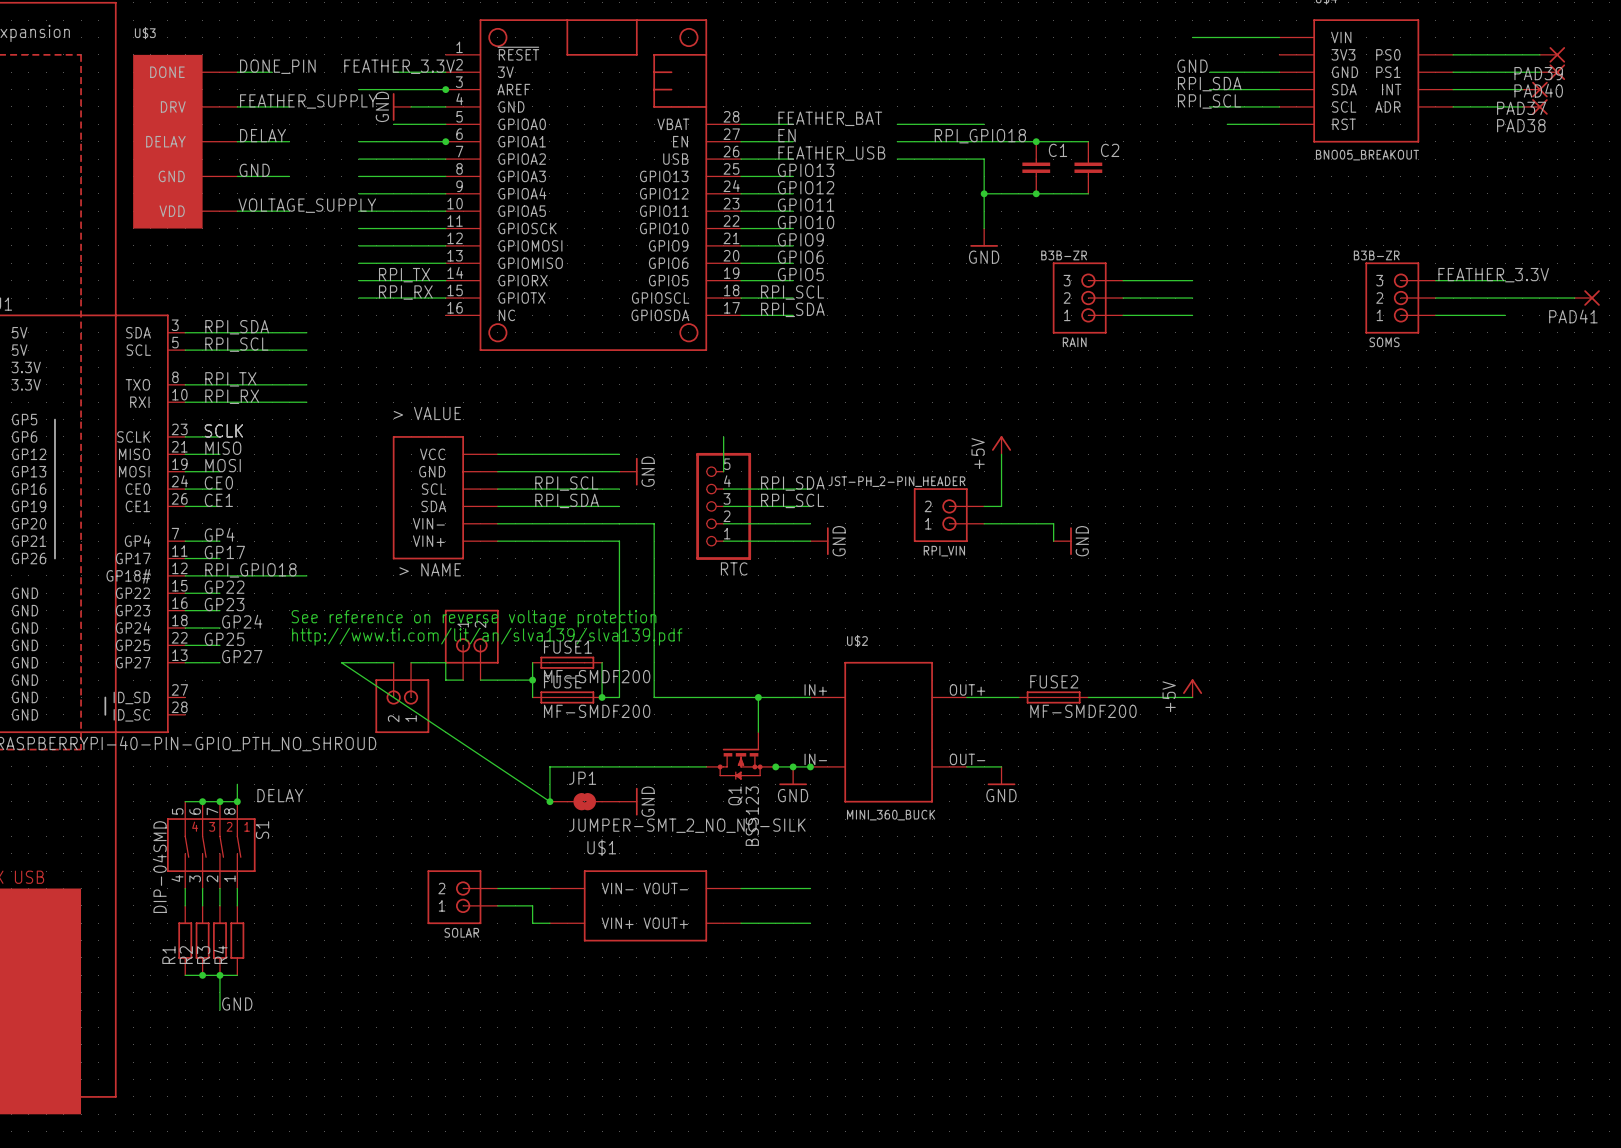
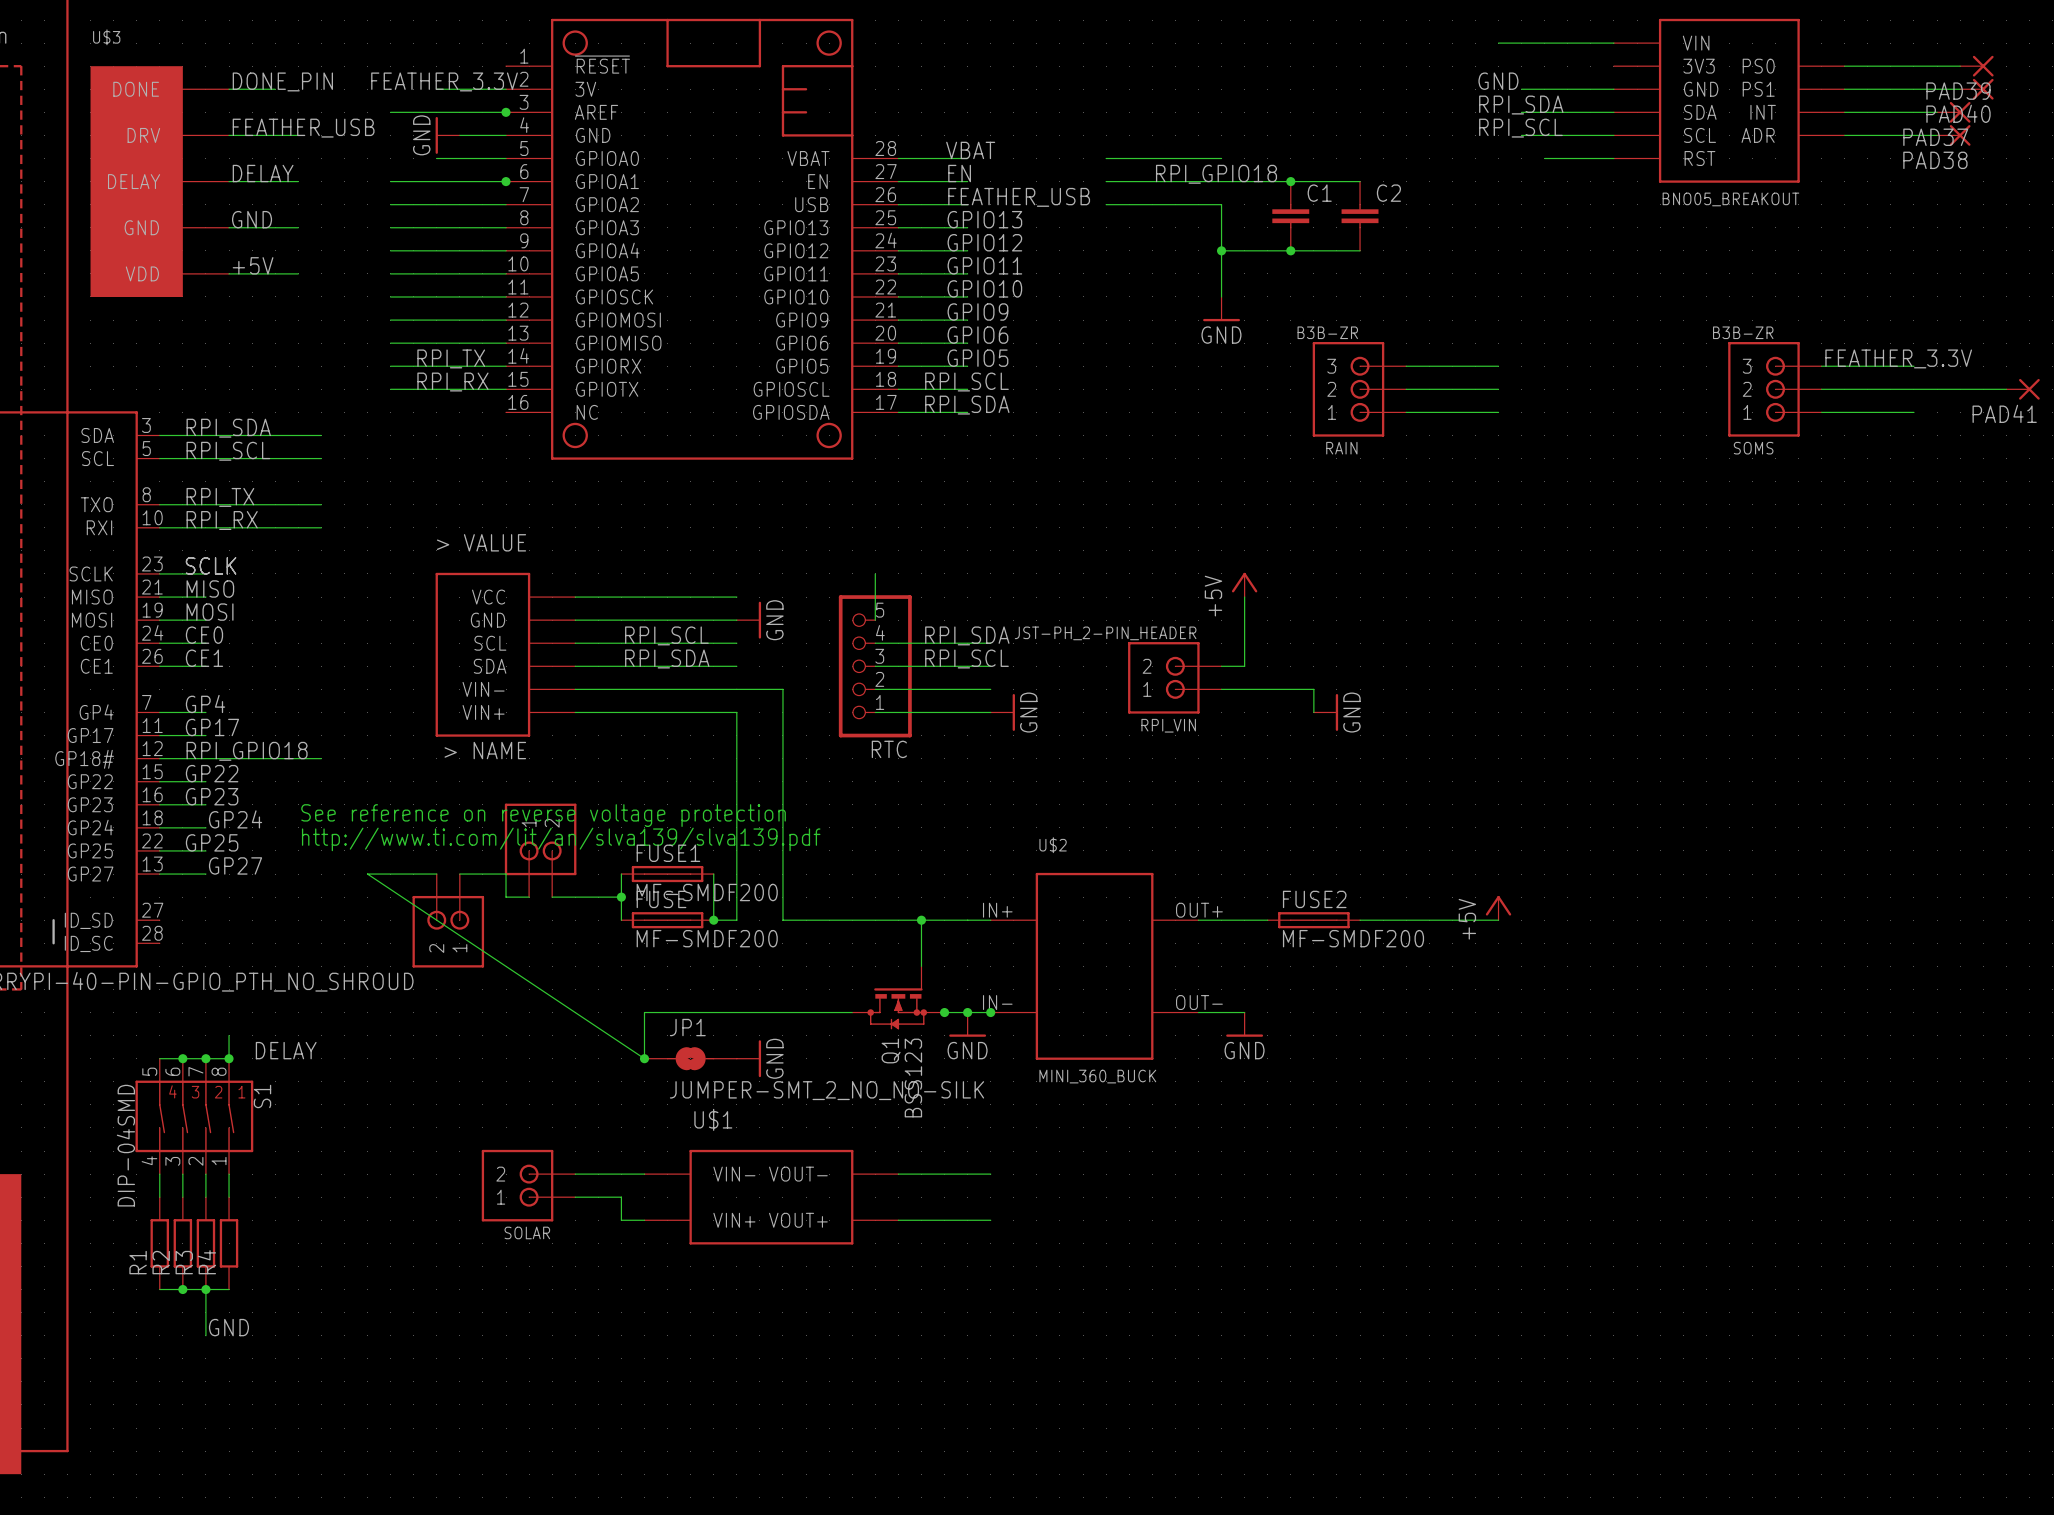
label: FEATHER_SUPPLY (308, 101) -> FEATHER_USB (303, 128)
label: FEATHER_BAT (830, 118) -> VBAT (970, 150)
label: VOLTAGE_SUPPLY (307, 205) -> +5V (253, 265)

